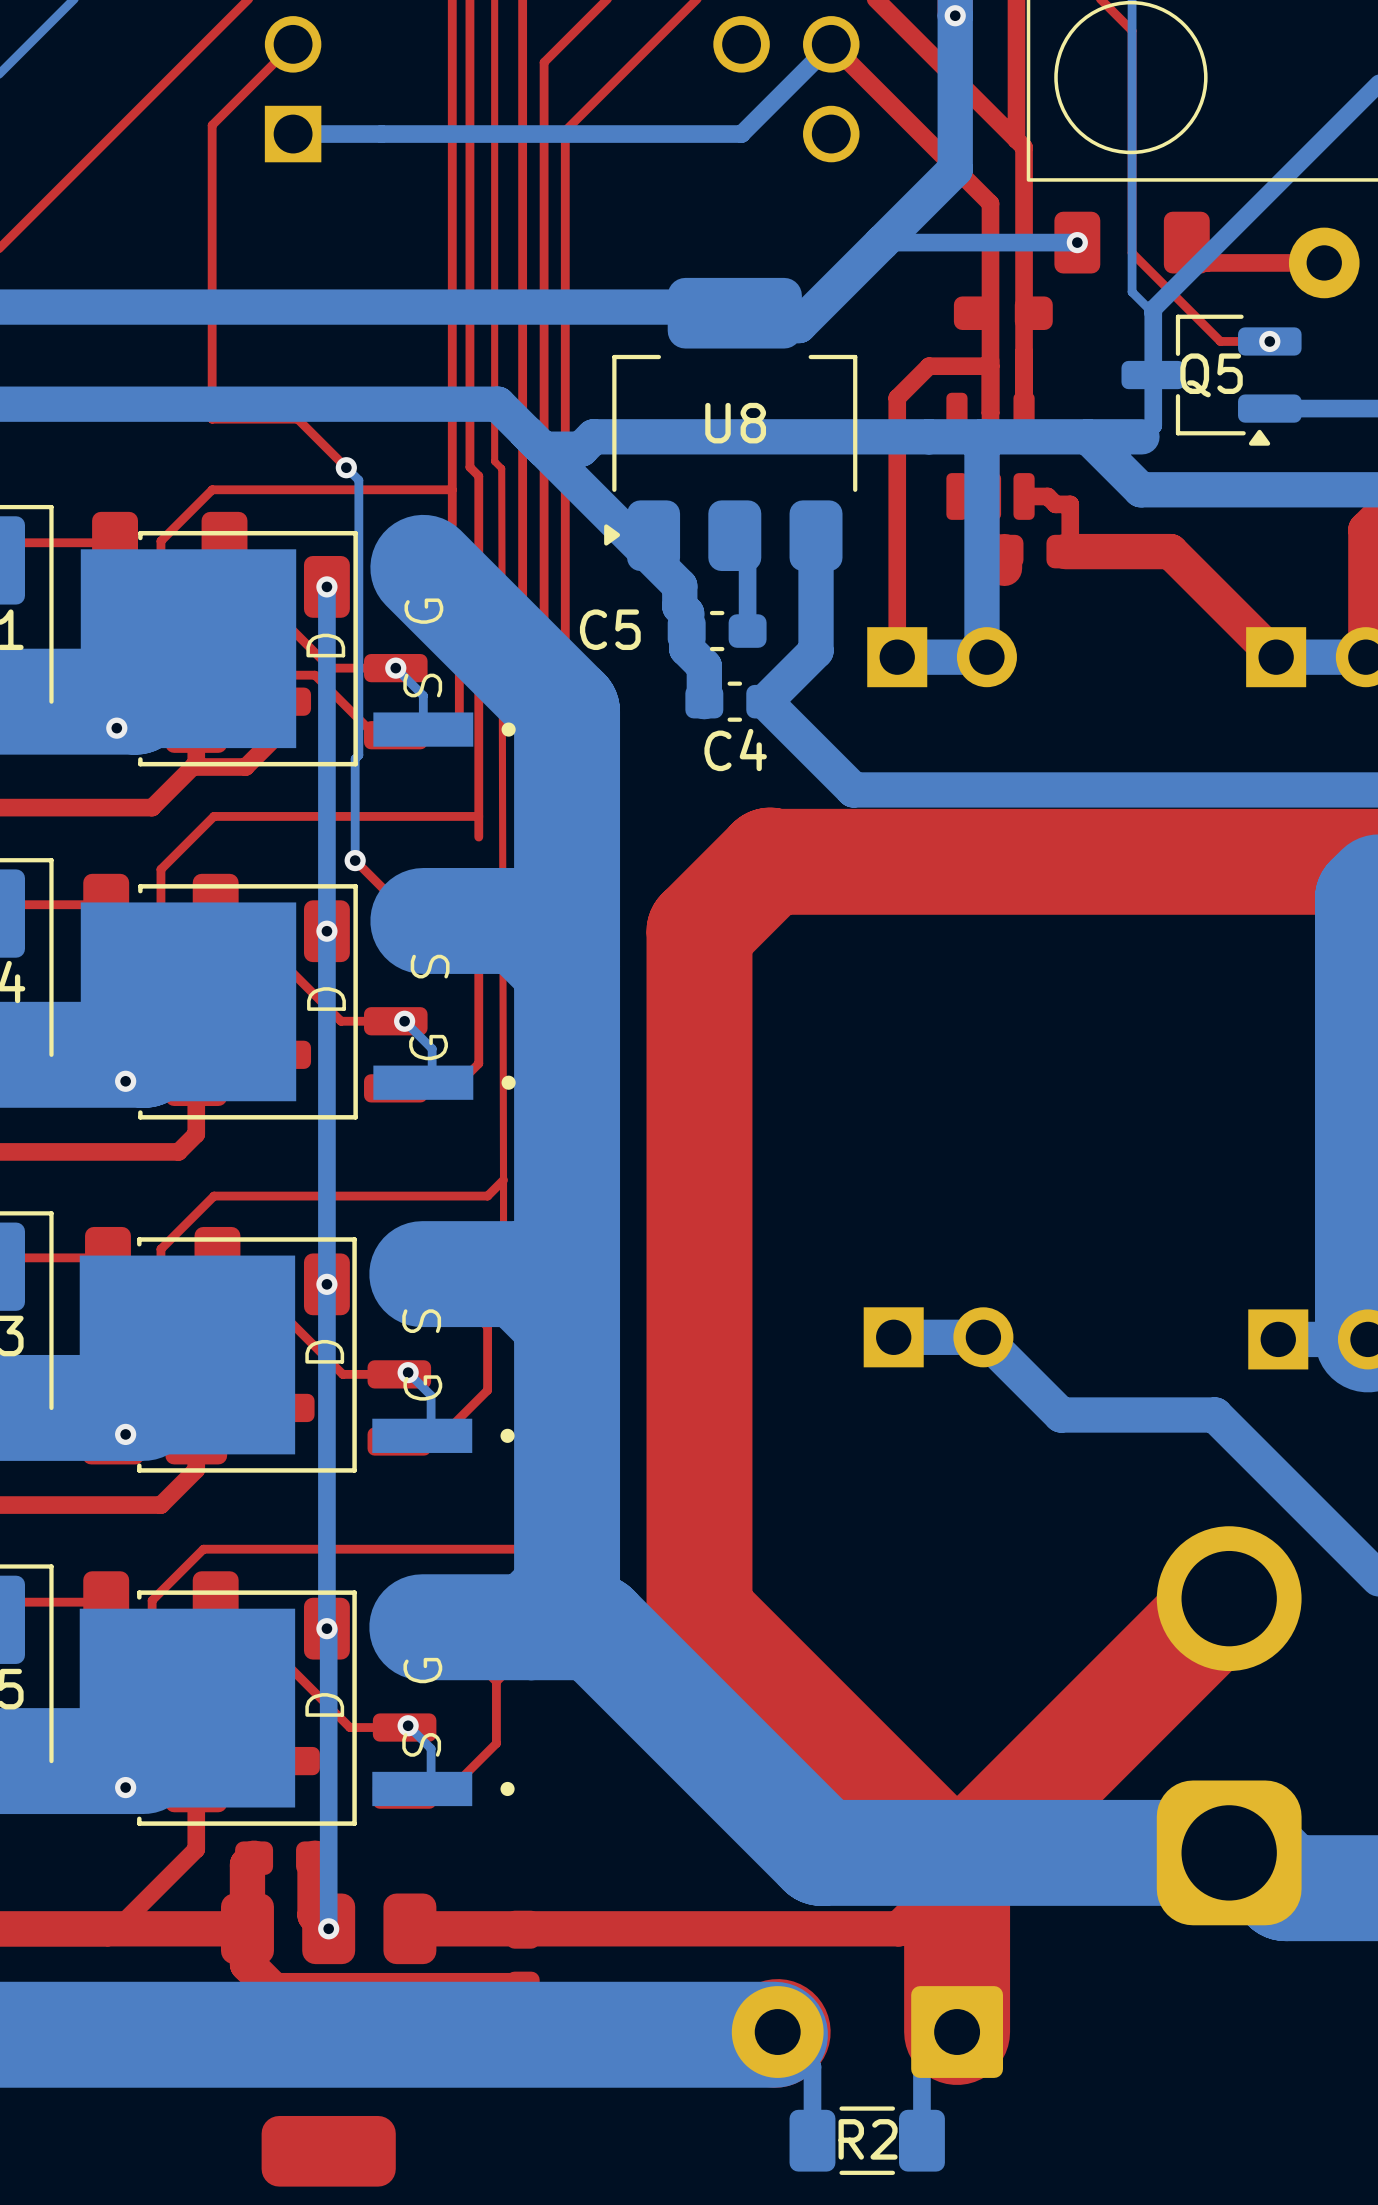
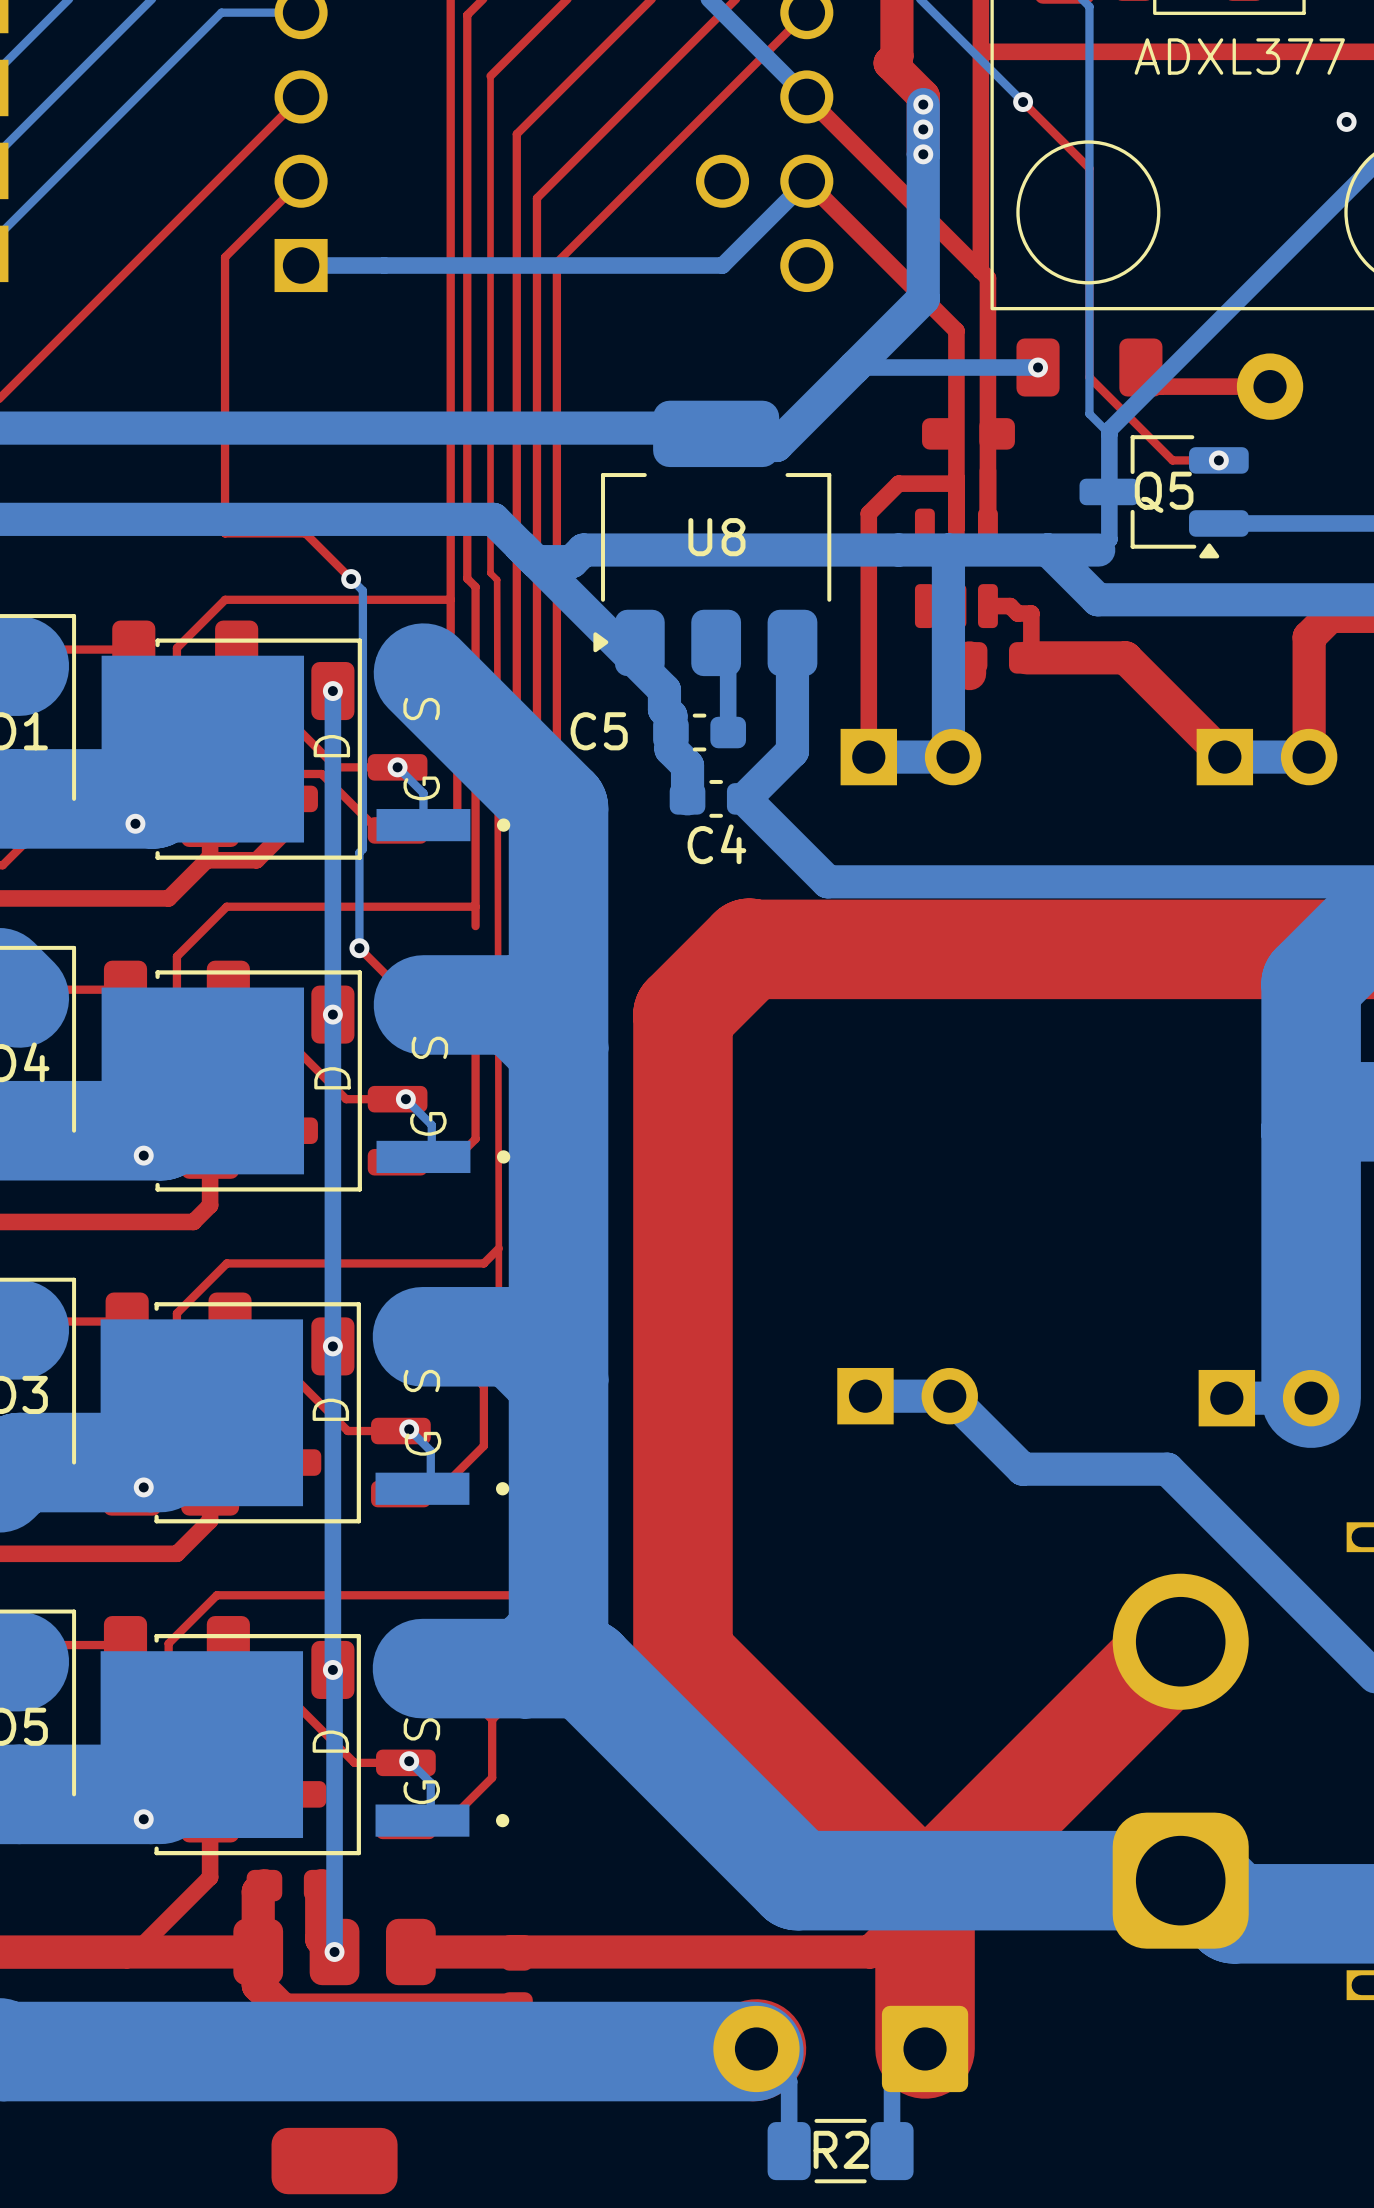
part text position: G (423, 611) -> G (421, 788)
part text position: S (422, 685) -> S (421, 709)
part text position: G (422, 1670) -> G (421, 1792)
part text position: S (421, 1744) -> S (421, 1729)

